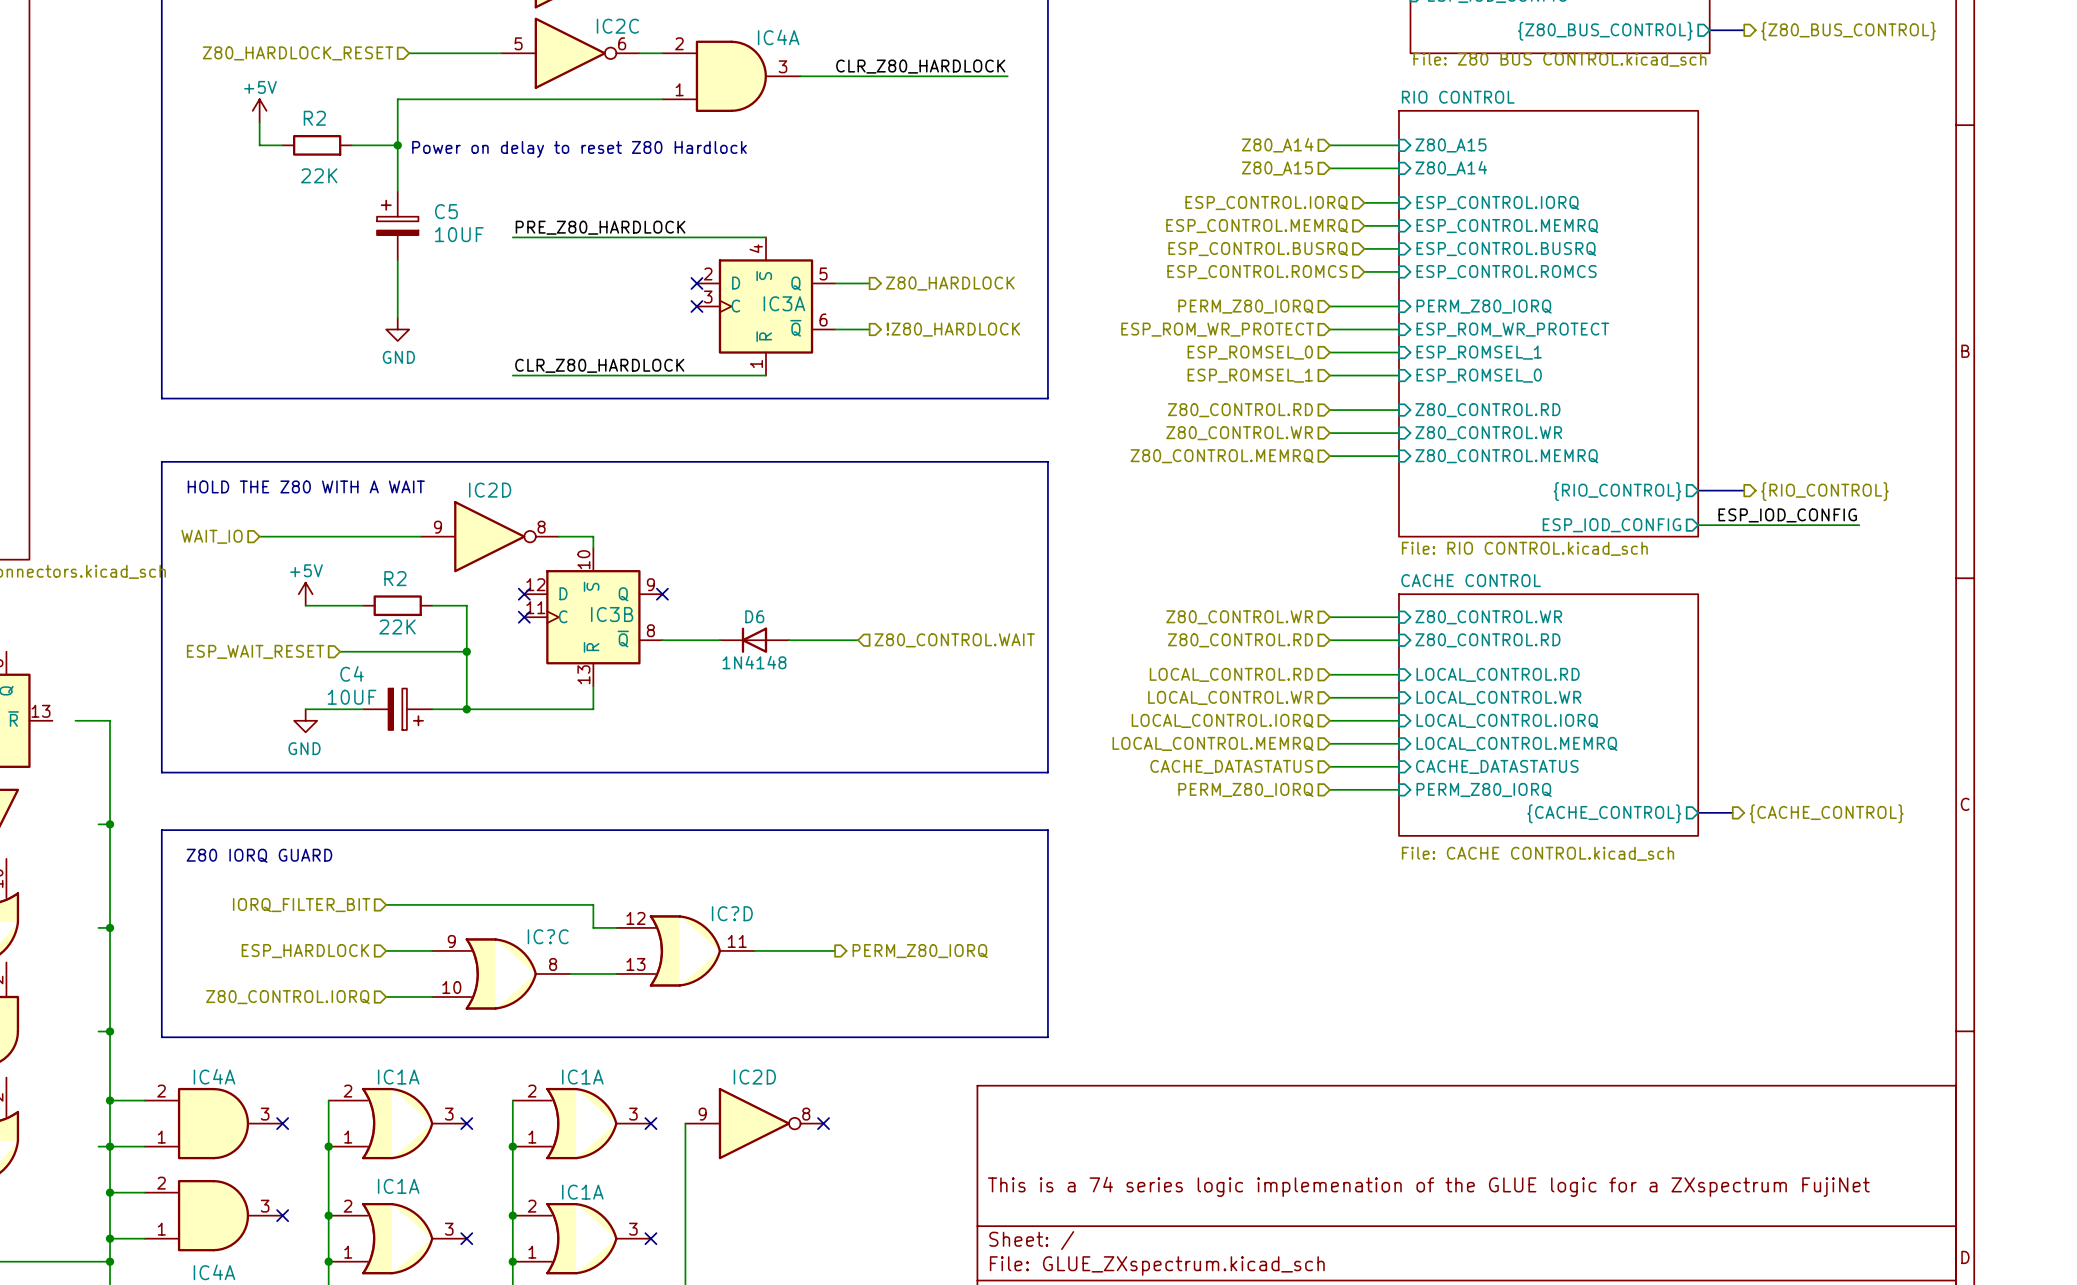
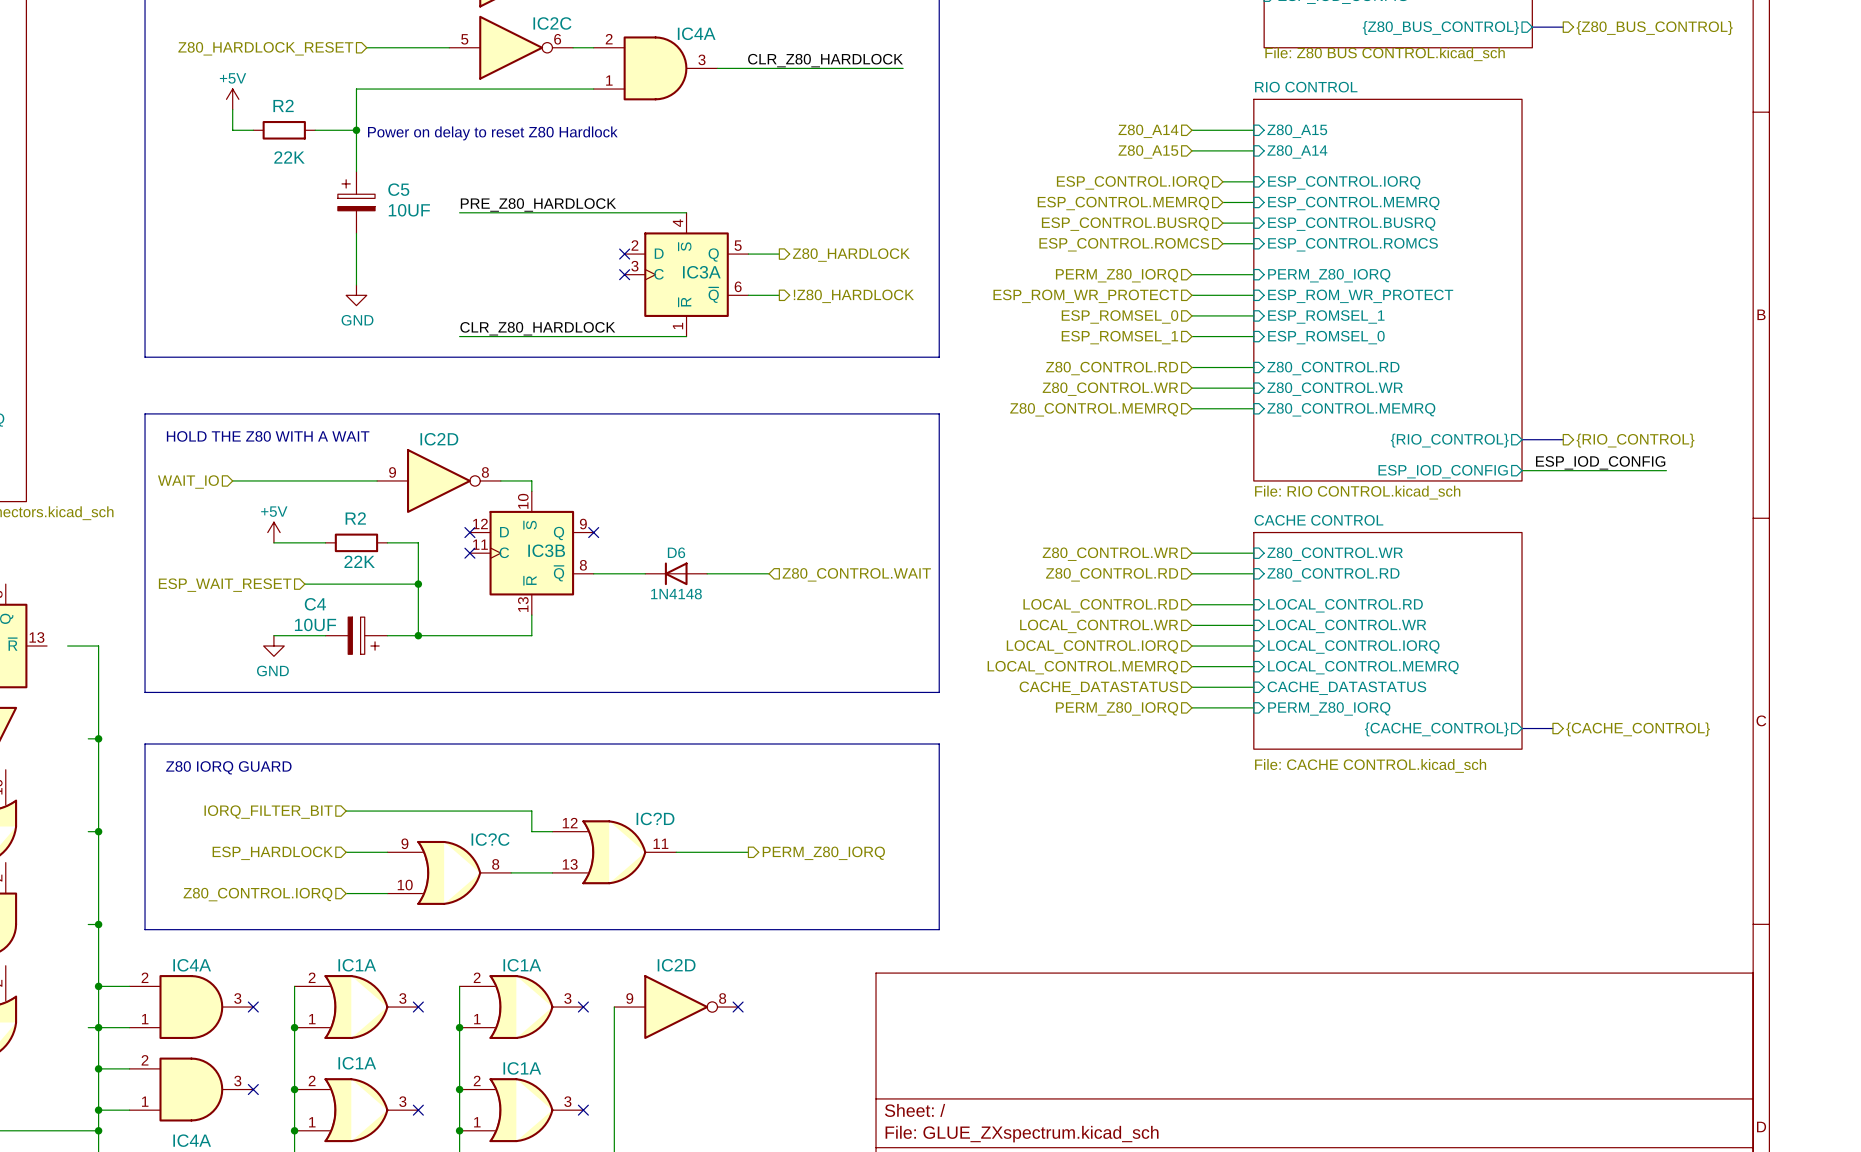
title block: This is a 74 series logic implemenation of the GLUE logic for a ZXspectrum FujiNet (1428, 1186) -> none

